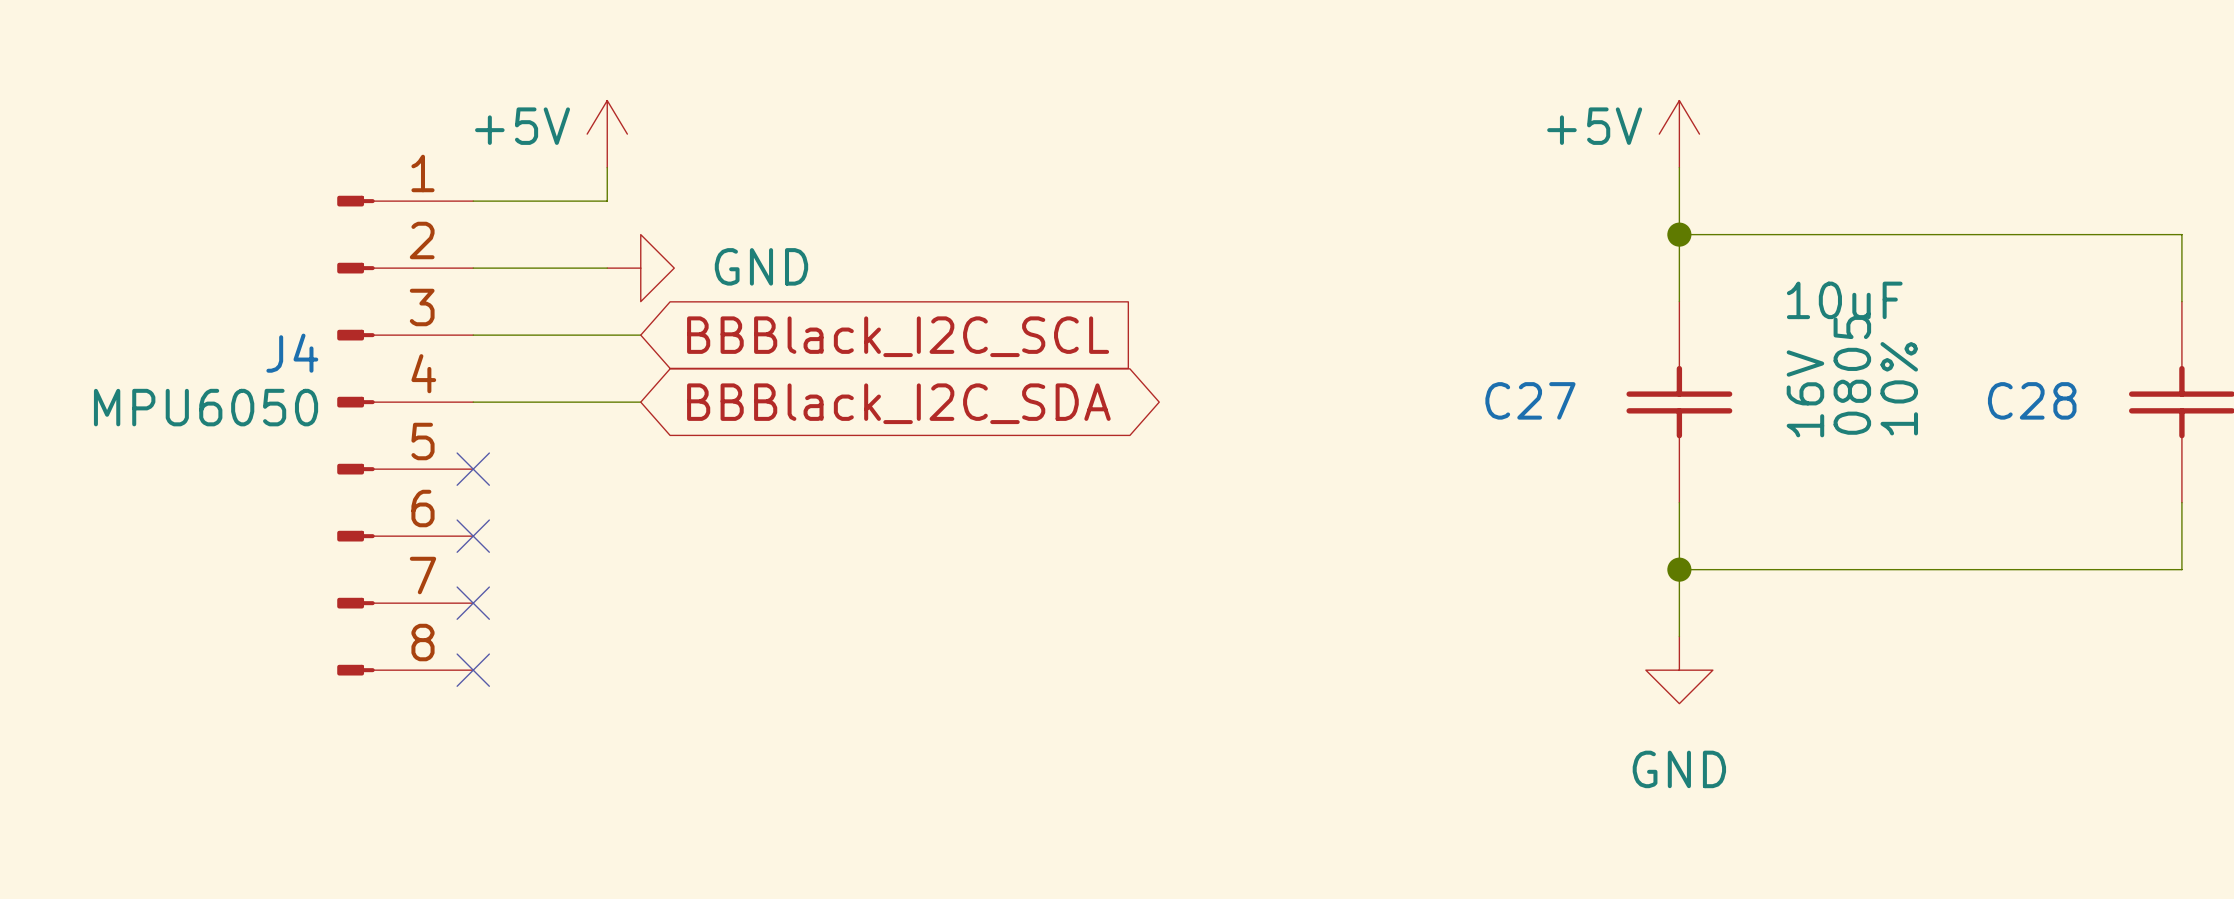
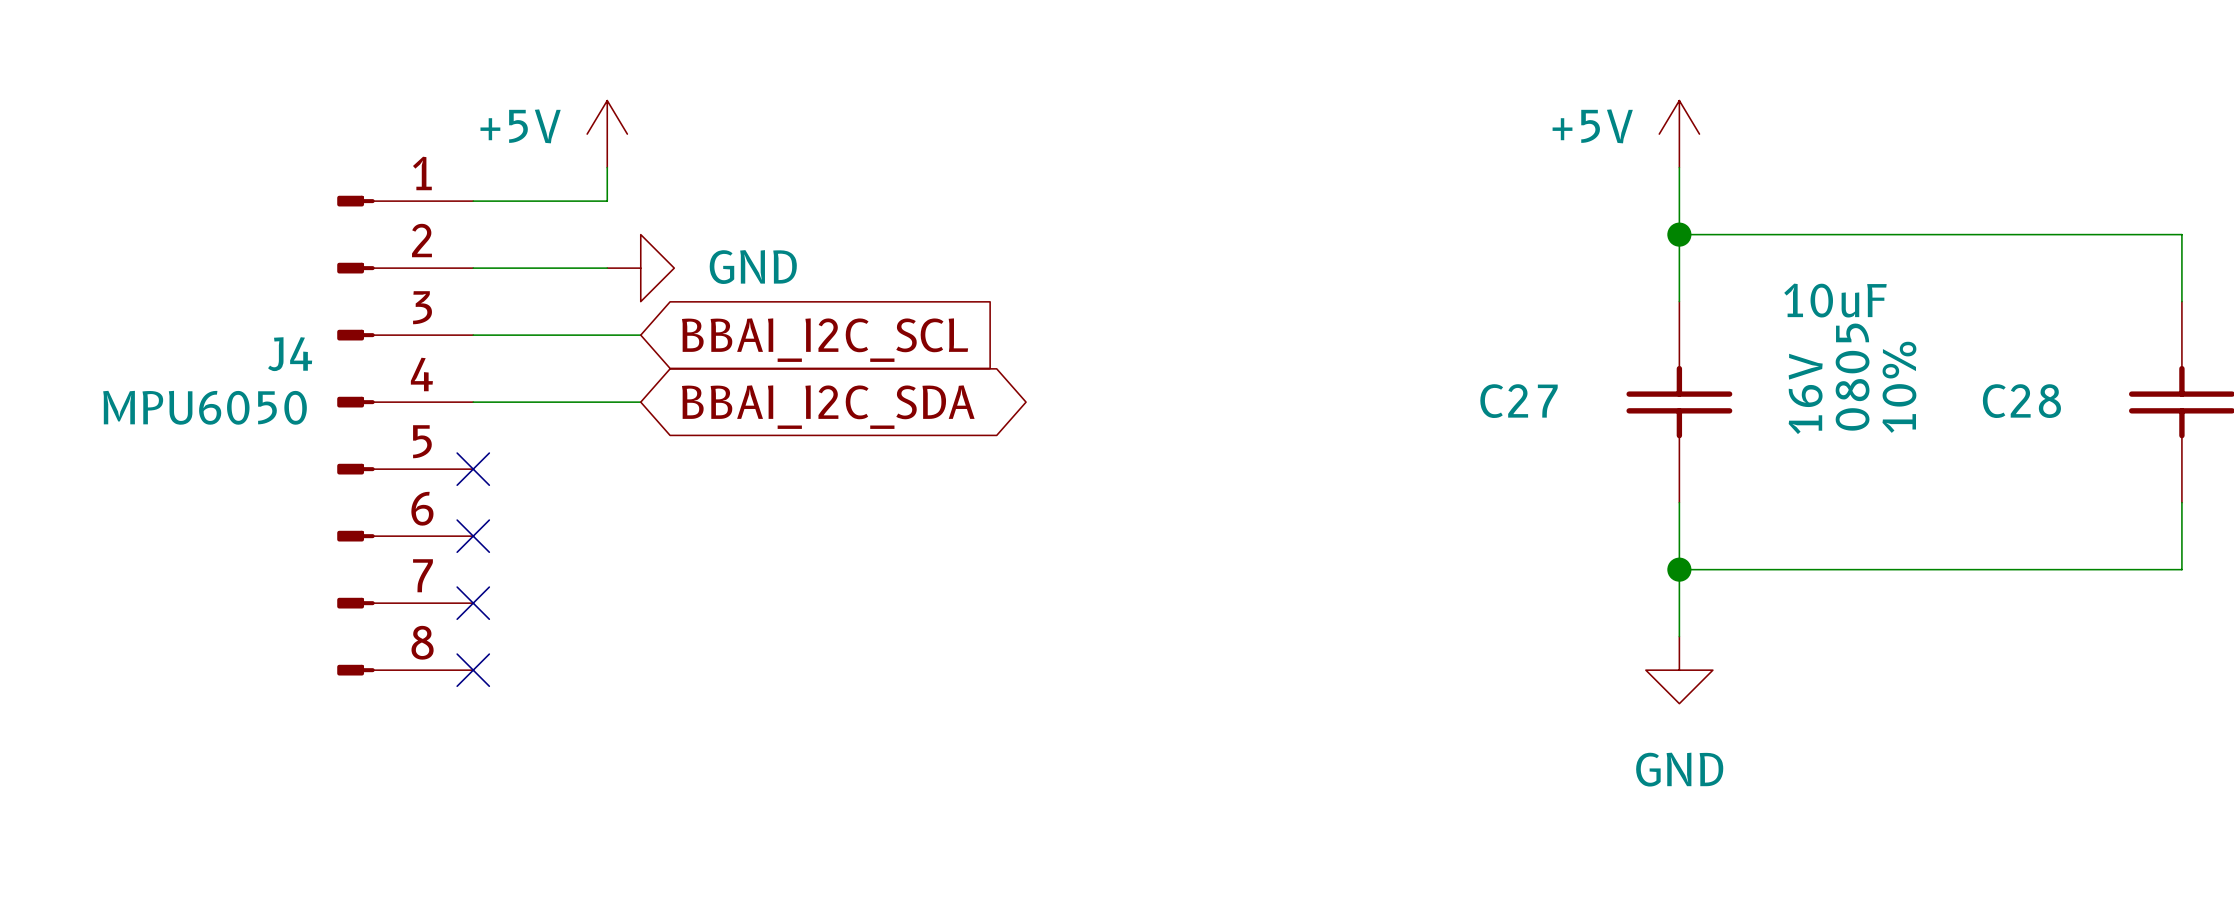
global label: BBBlack_I2C_SCL (898, 336) -> BBAI_I2C_SCL (825, 340)
global label: BBBlack_I2C_SDA (898, 403) -> BBAI_I2C_SDA (828, 407)

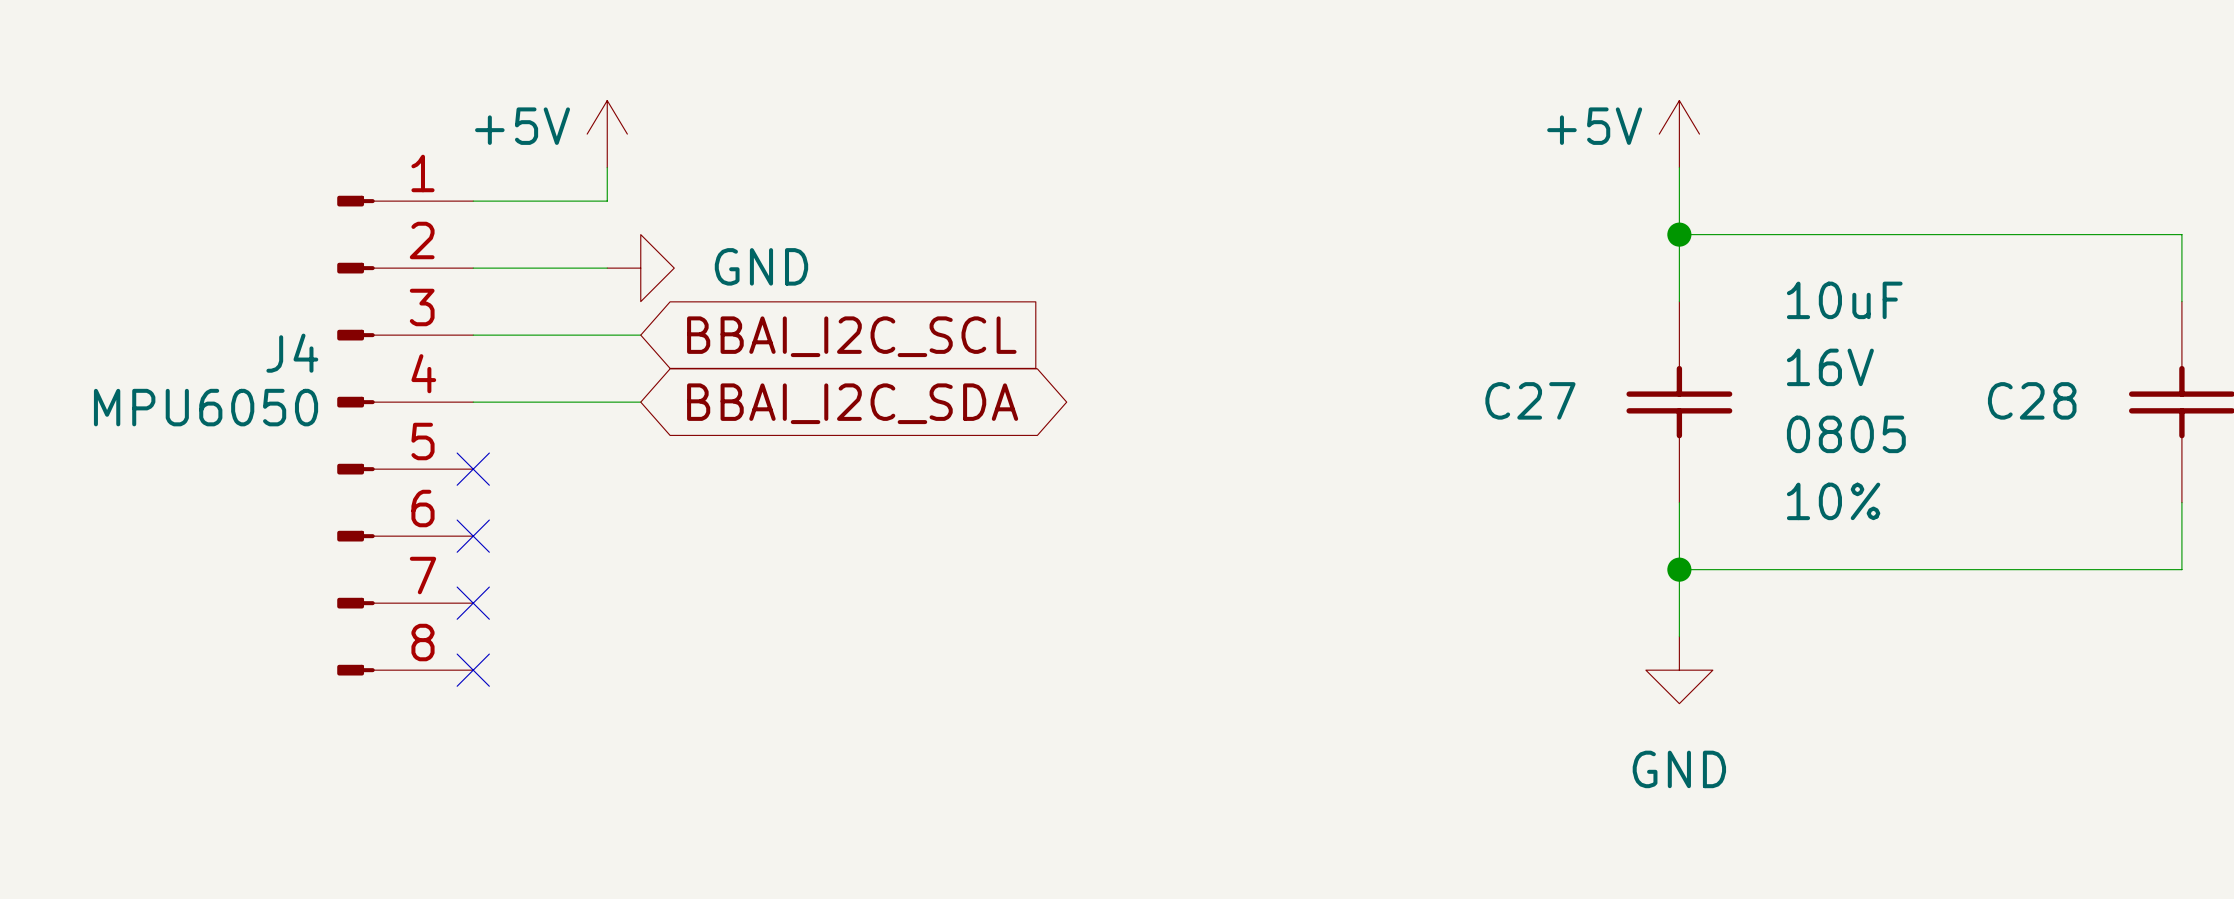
C27 text rotation: 0° (1852, 377) -> 90° clockwise (1846, 434)
C27 text rotation: 0° (1899, 387) -> 90° clockwise (1833, 501)
C27 text position: 10% (1899, 387) -> 10% (1833, 501)
C27 text rotation: 0° (1805, 393) -> 90° clockwise (1830, 367)

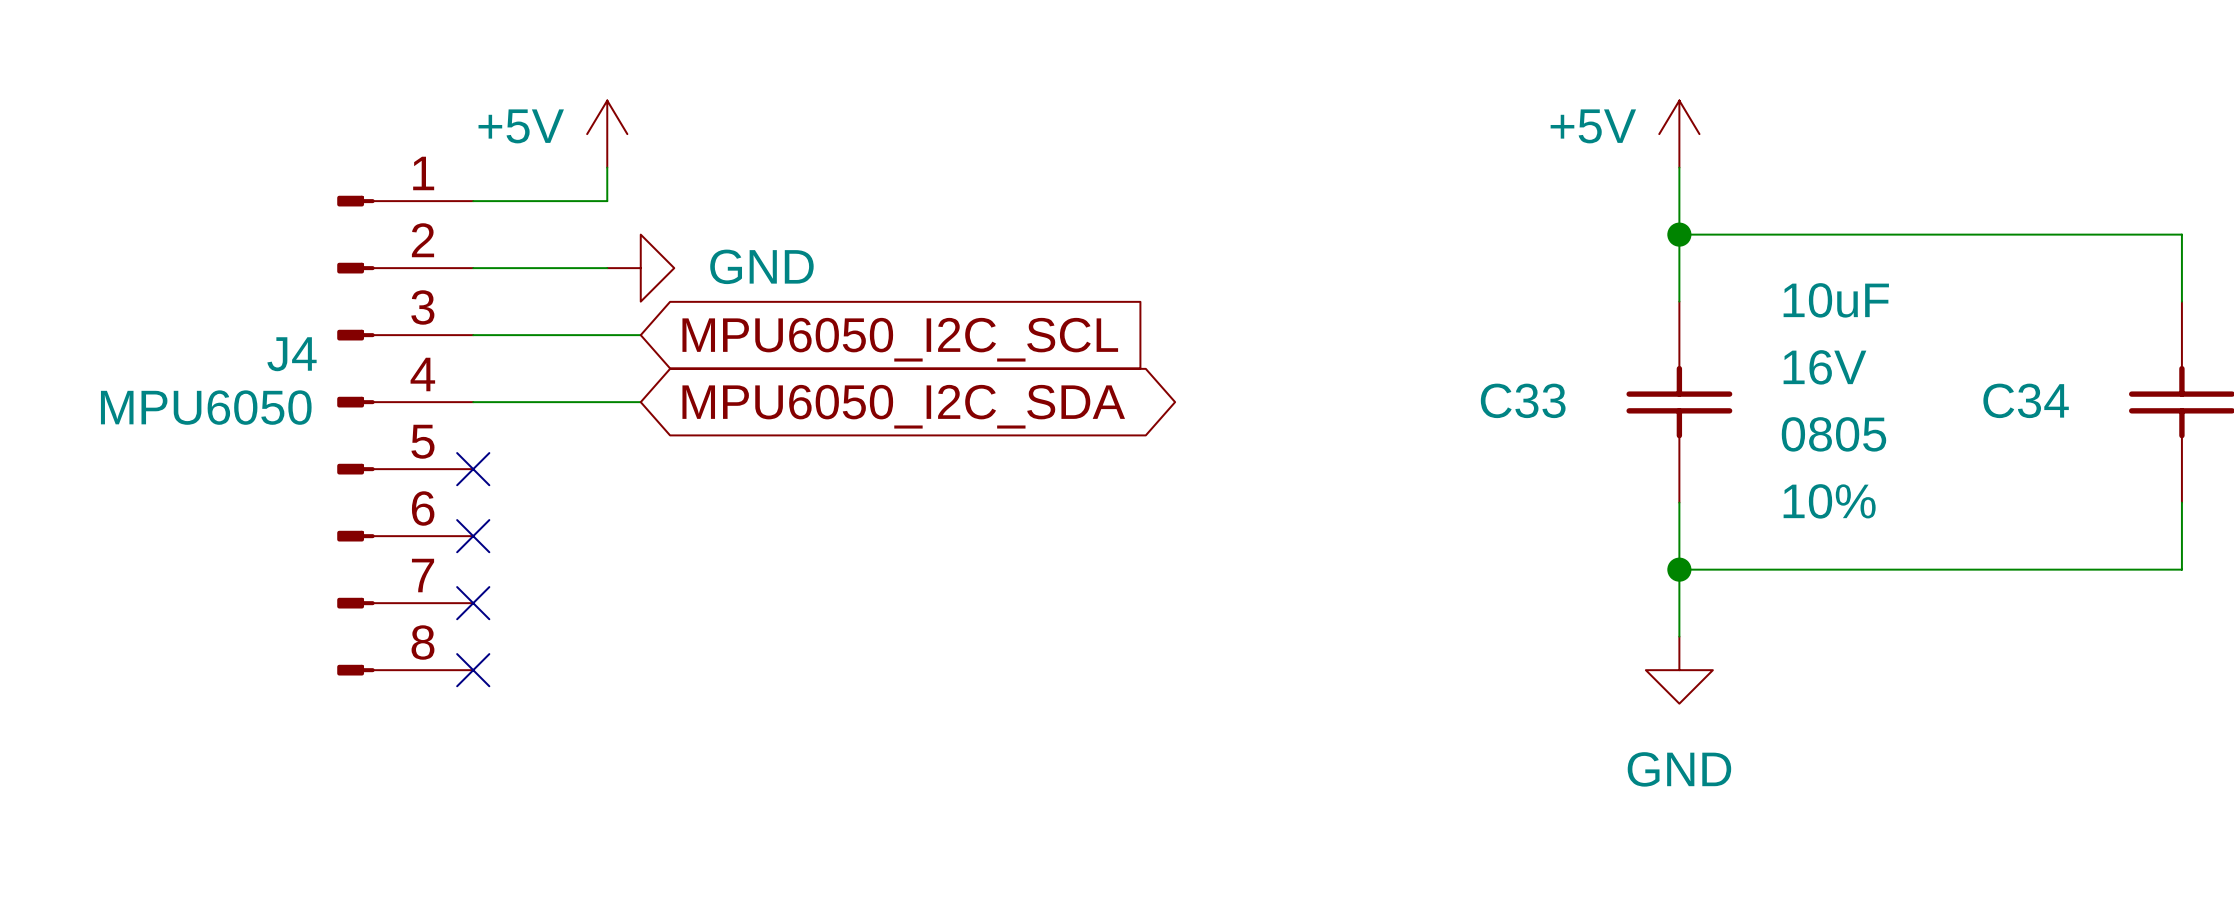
global label: BBAI_I2C_SCL (851, 336) -> MPU6050_I2C_SCL (900, 339)
C27 name: C27 (1530, 400) -> C33 (1523, 400)
C28 name: C28 (2032, 400) -> C34 (2026, 400)
global label: BBAI_I2C_SDA (852, 403) -> MPU6050_I2C_SDA (903, 406)

